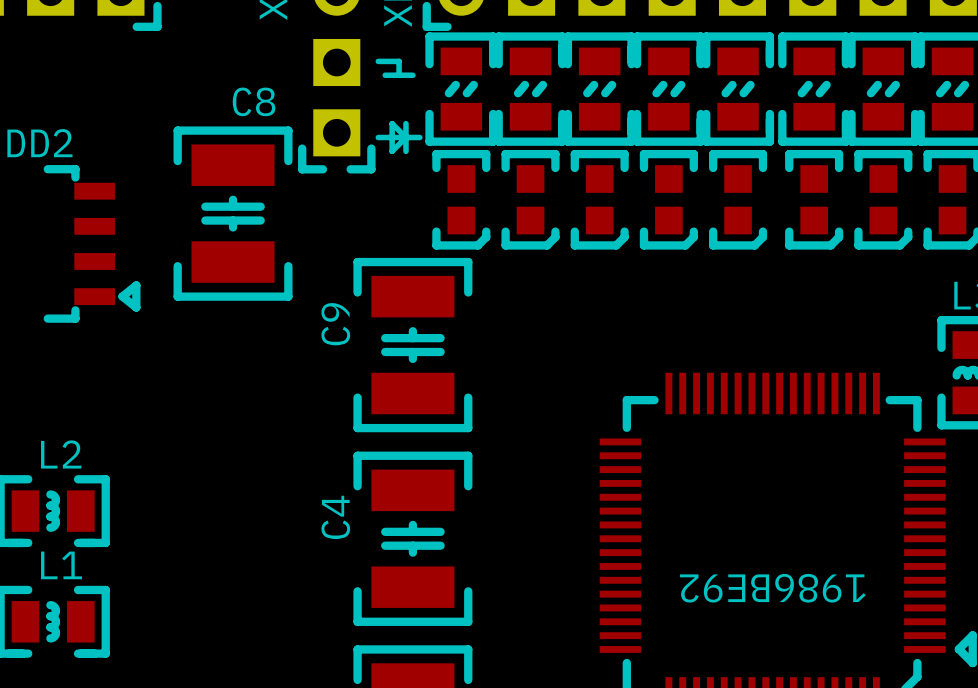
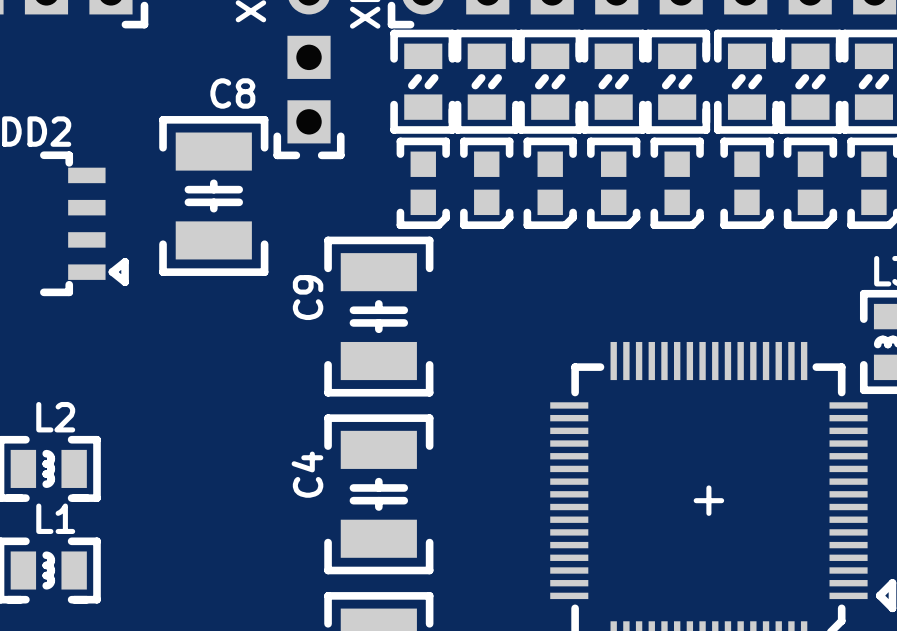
line: (378, 61) (399, 61) (399, 75) -> none
line: (385, 75) (412, 75) -> (696, 500) (721, 500)
line: (392, 123) (392, 151) (405, 137) (392, 123) -> none
line: (405, 123) (405, 151) -> (708, 487) (708, 513)
line: (378, 137) (419, 137) -> none
text: 1986ВЕ92 (772, 588) -> none

